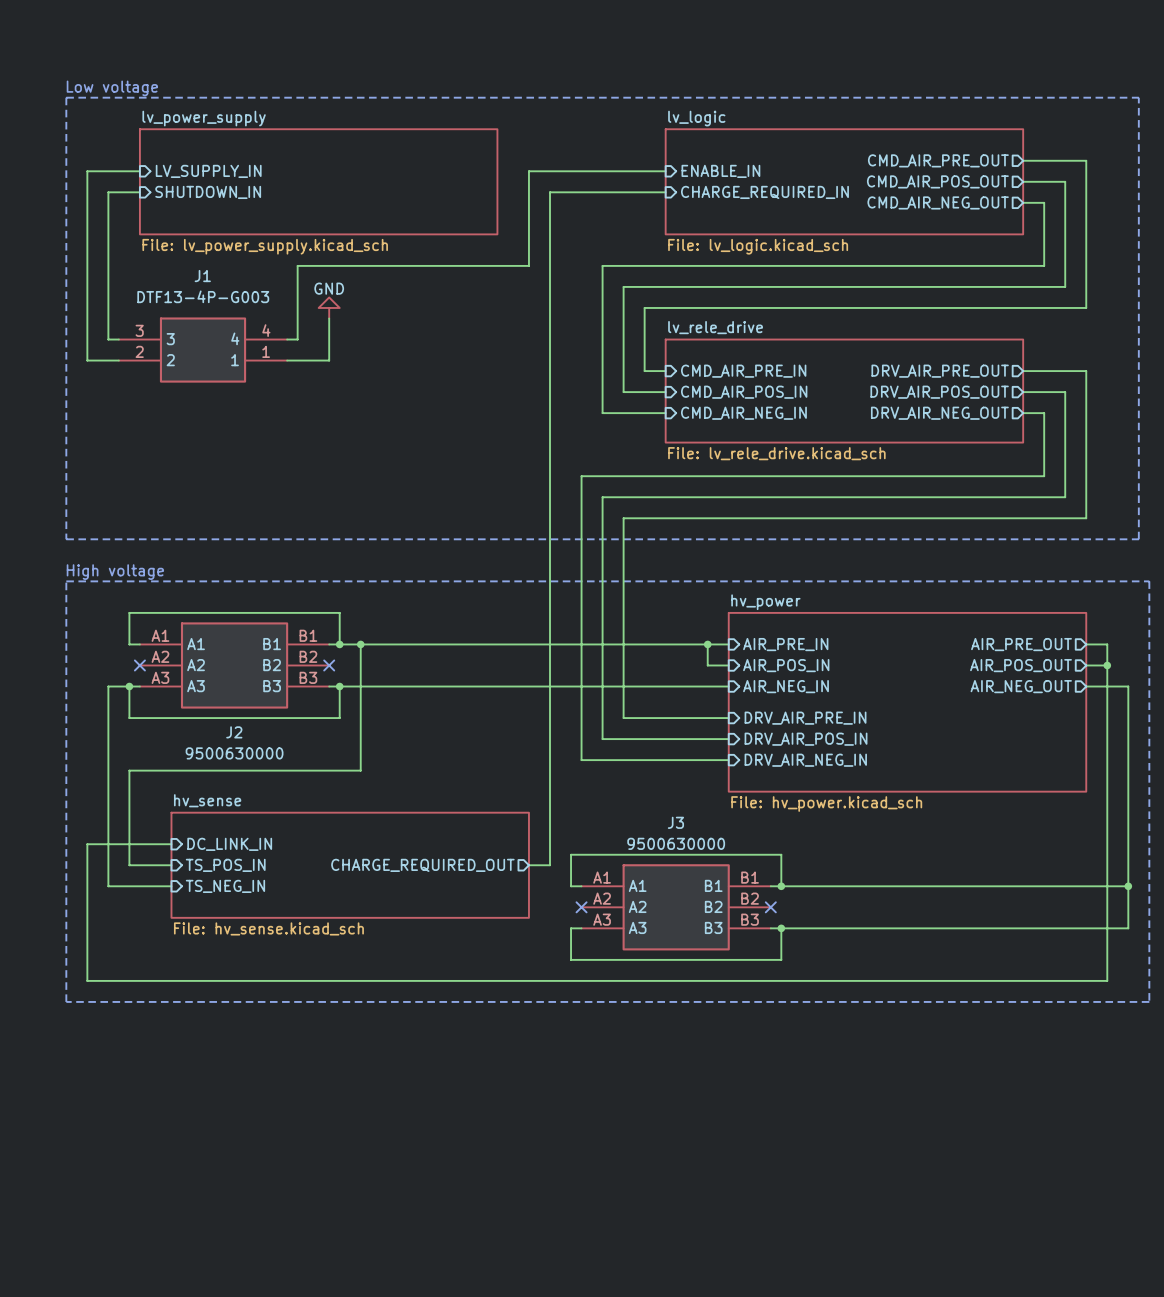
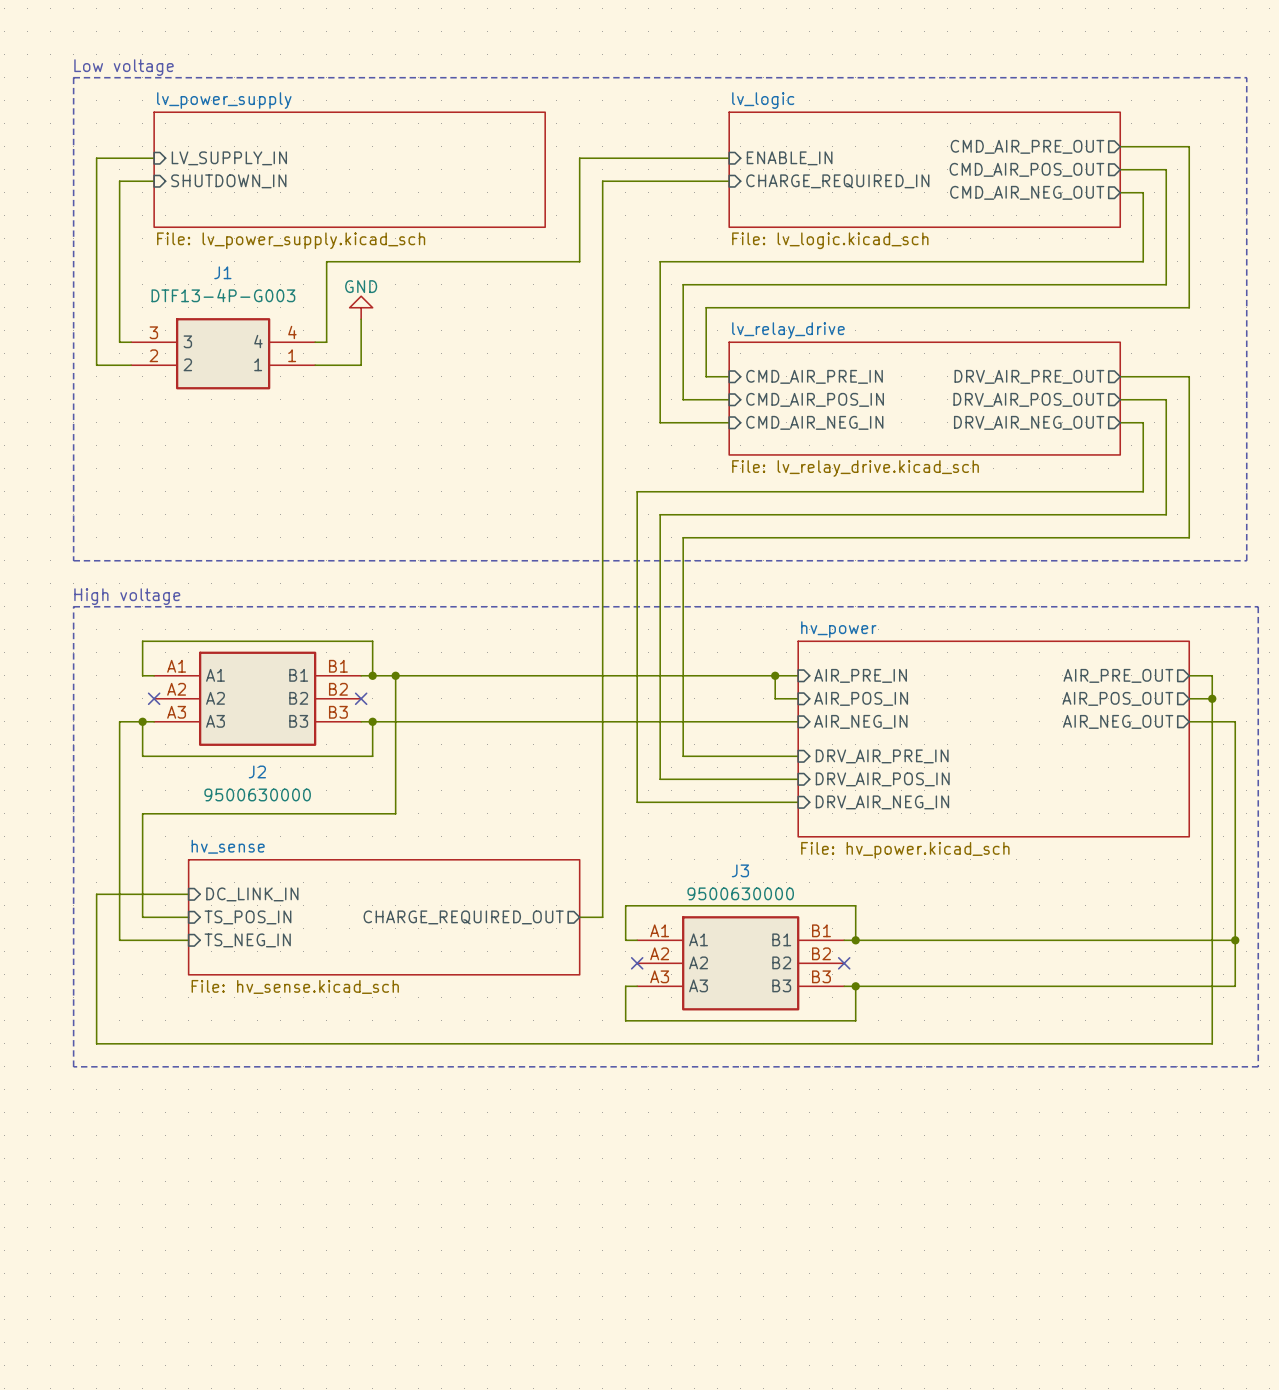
sheet lv_rele_drive name: lv_rele_drive (715, 327) -> lv_relay_drive (788, 330)
sheet lv_rele_drive value: File: lv_rele_drive.kicad_sch (776, 453) -> File: lv_relay_drive.kicad_sch (855, 468)

